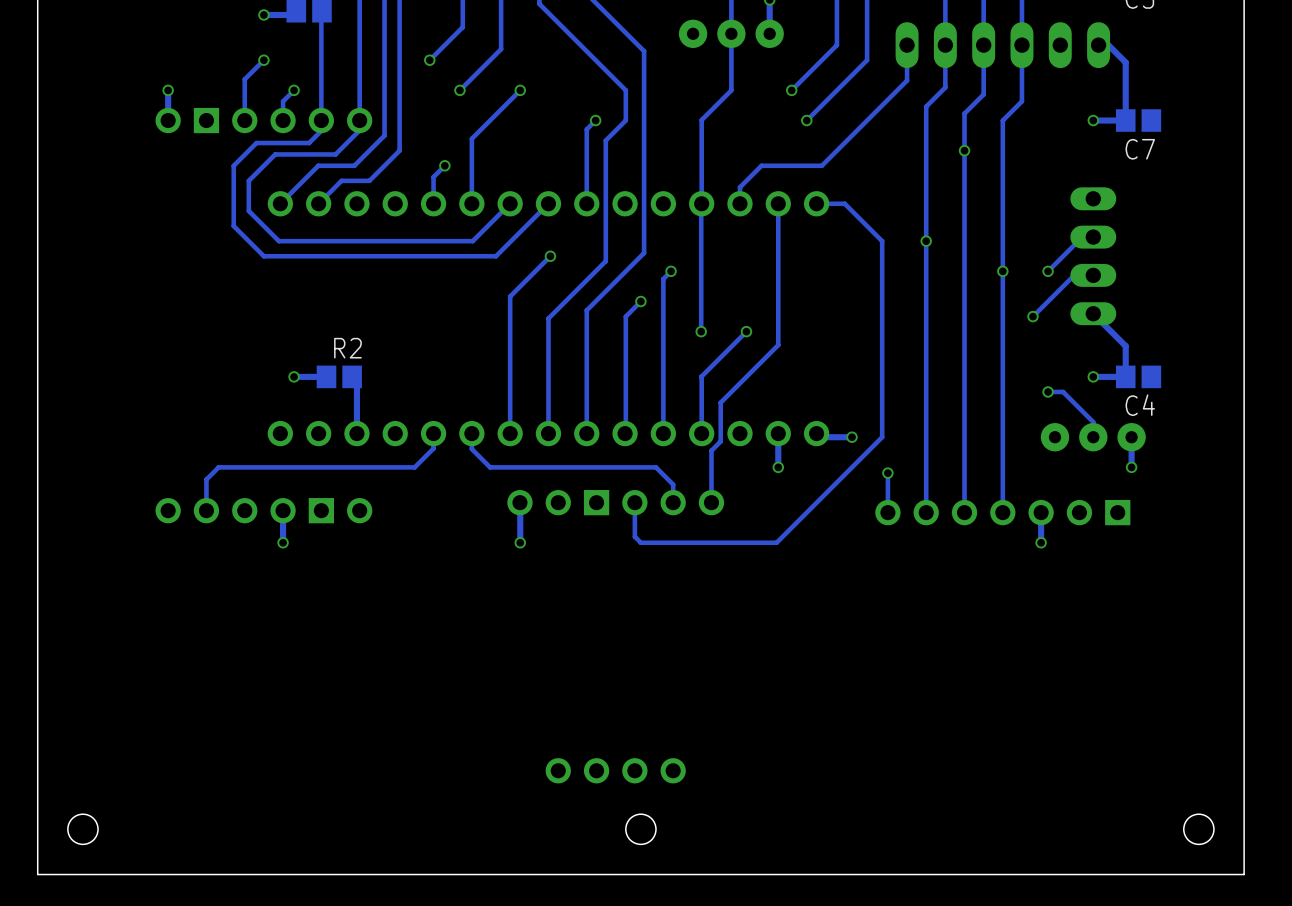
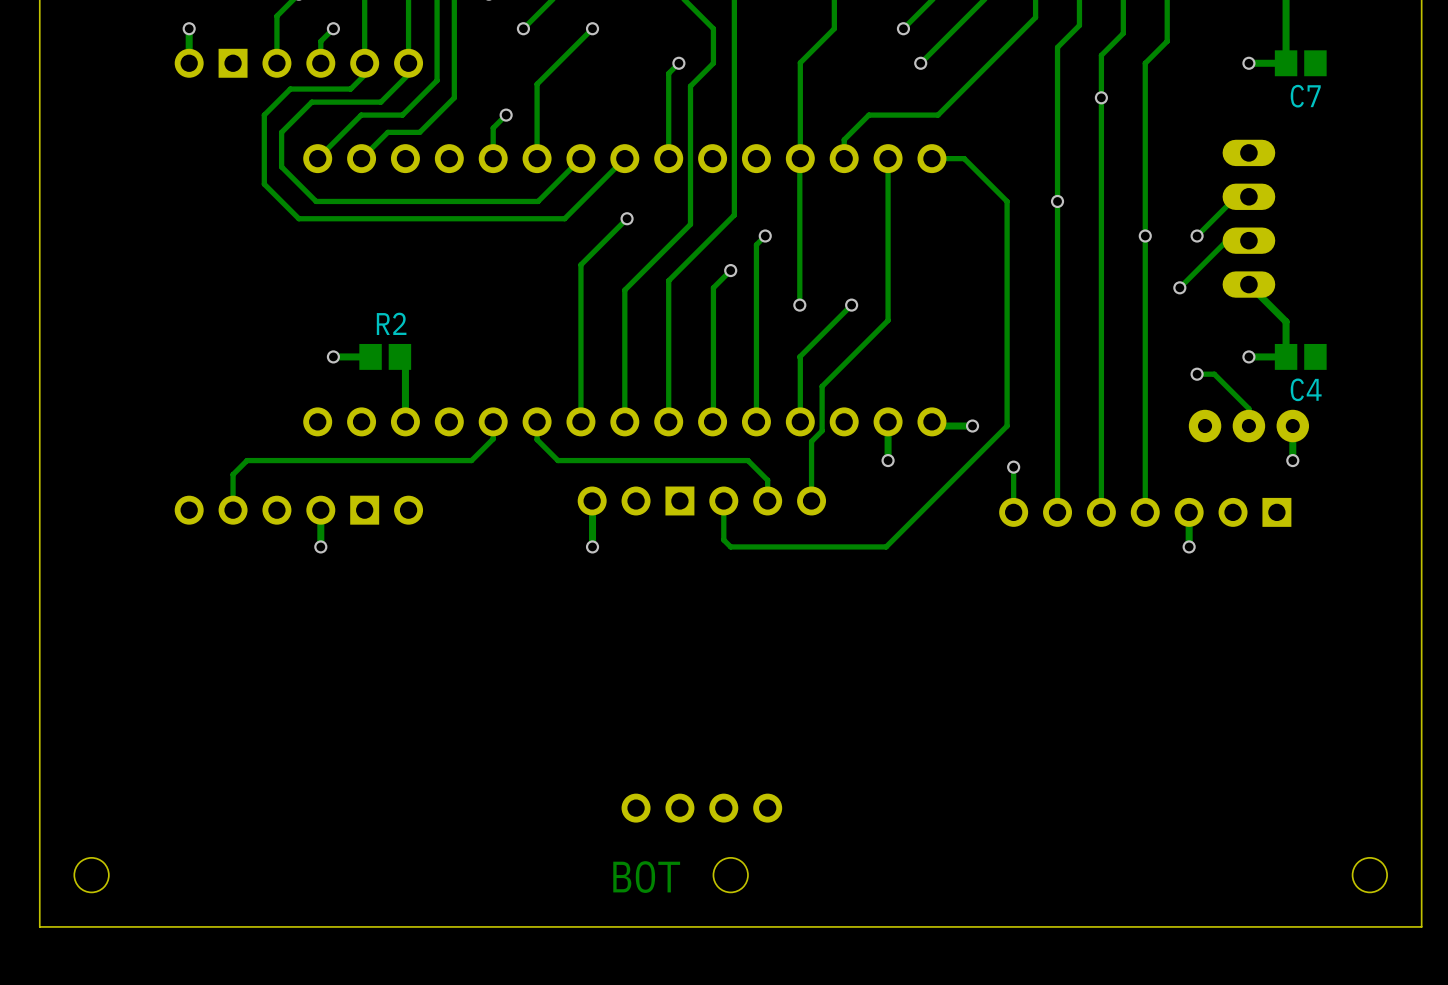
text: none -> BOT (646, 877)

